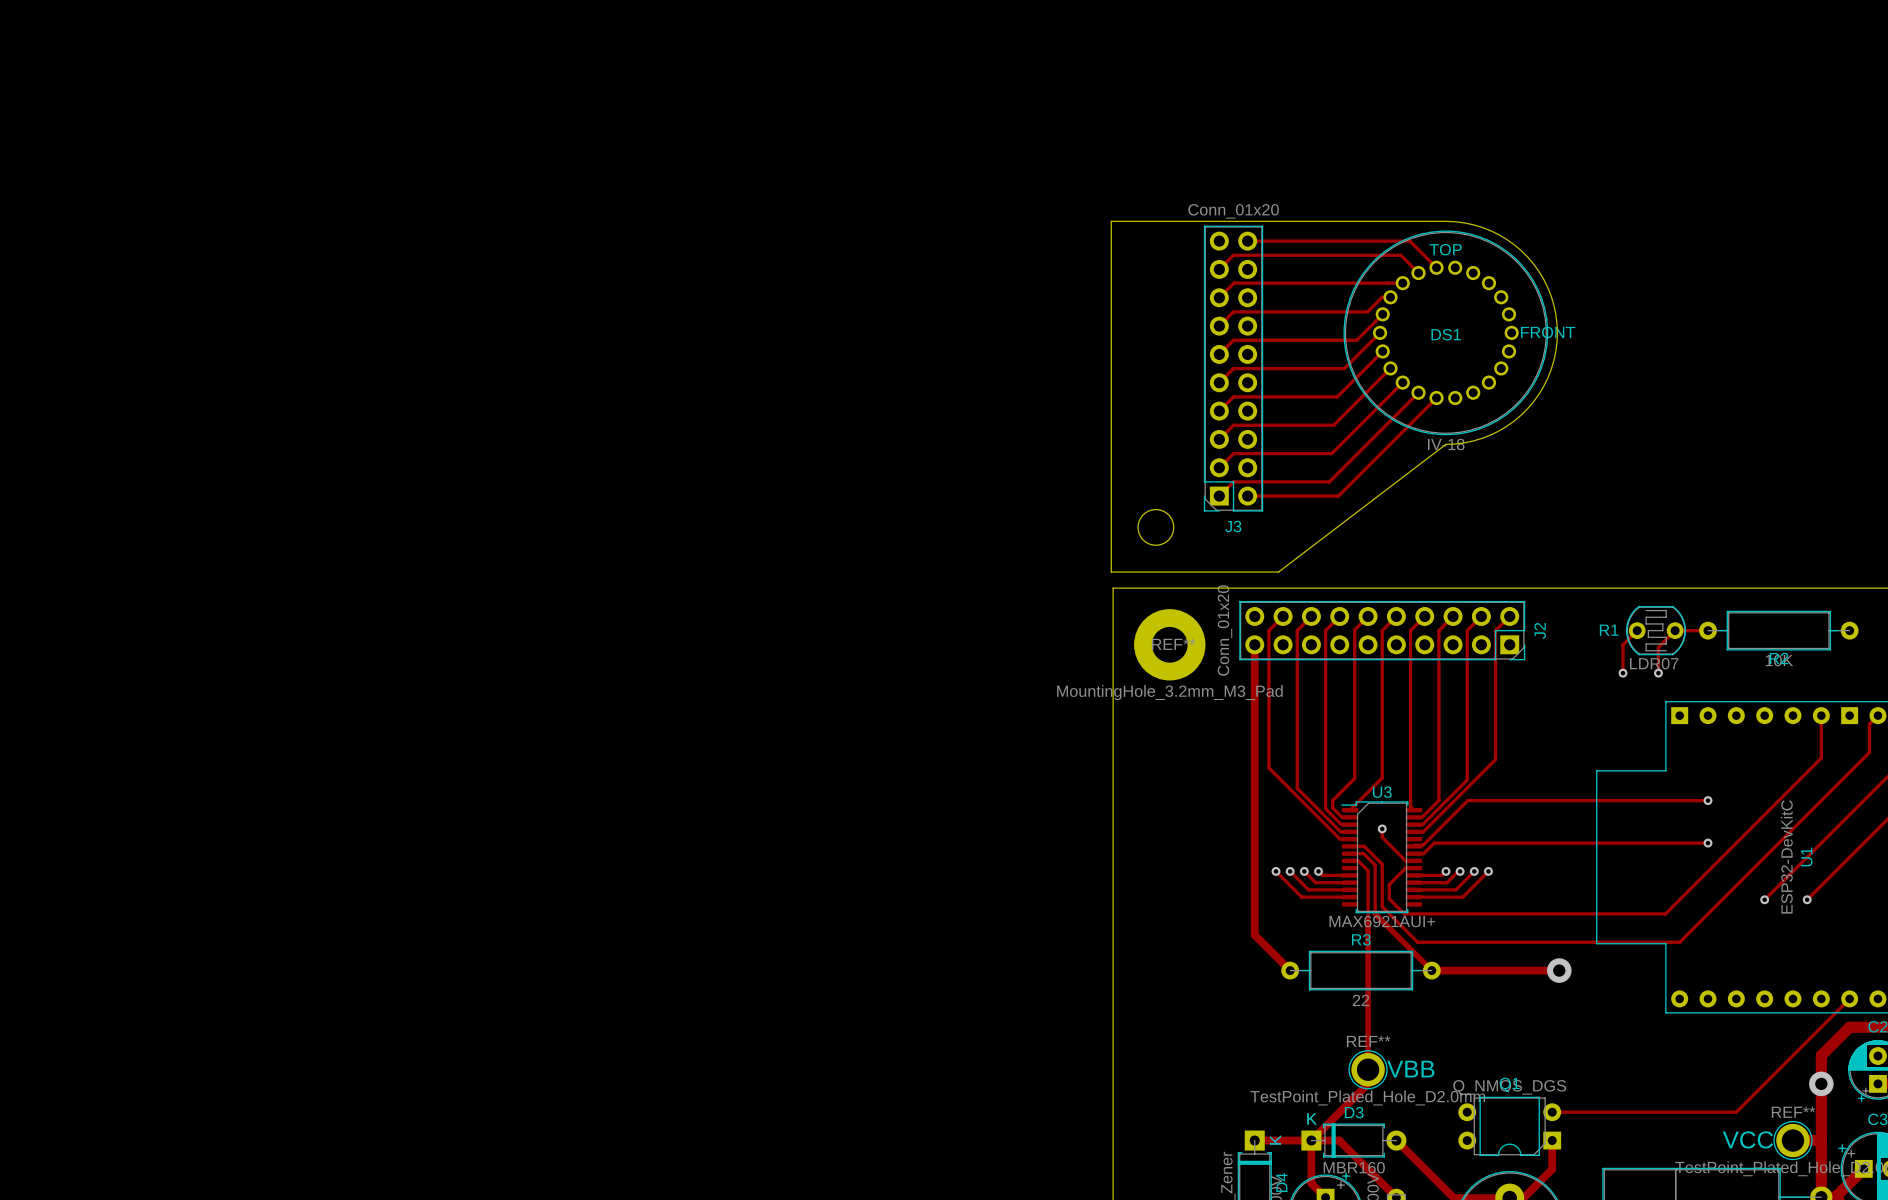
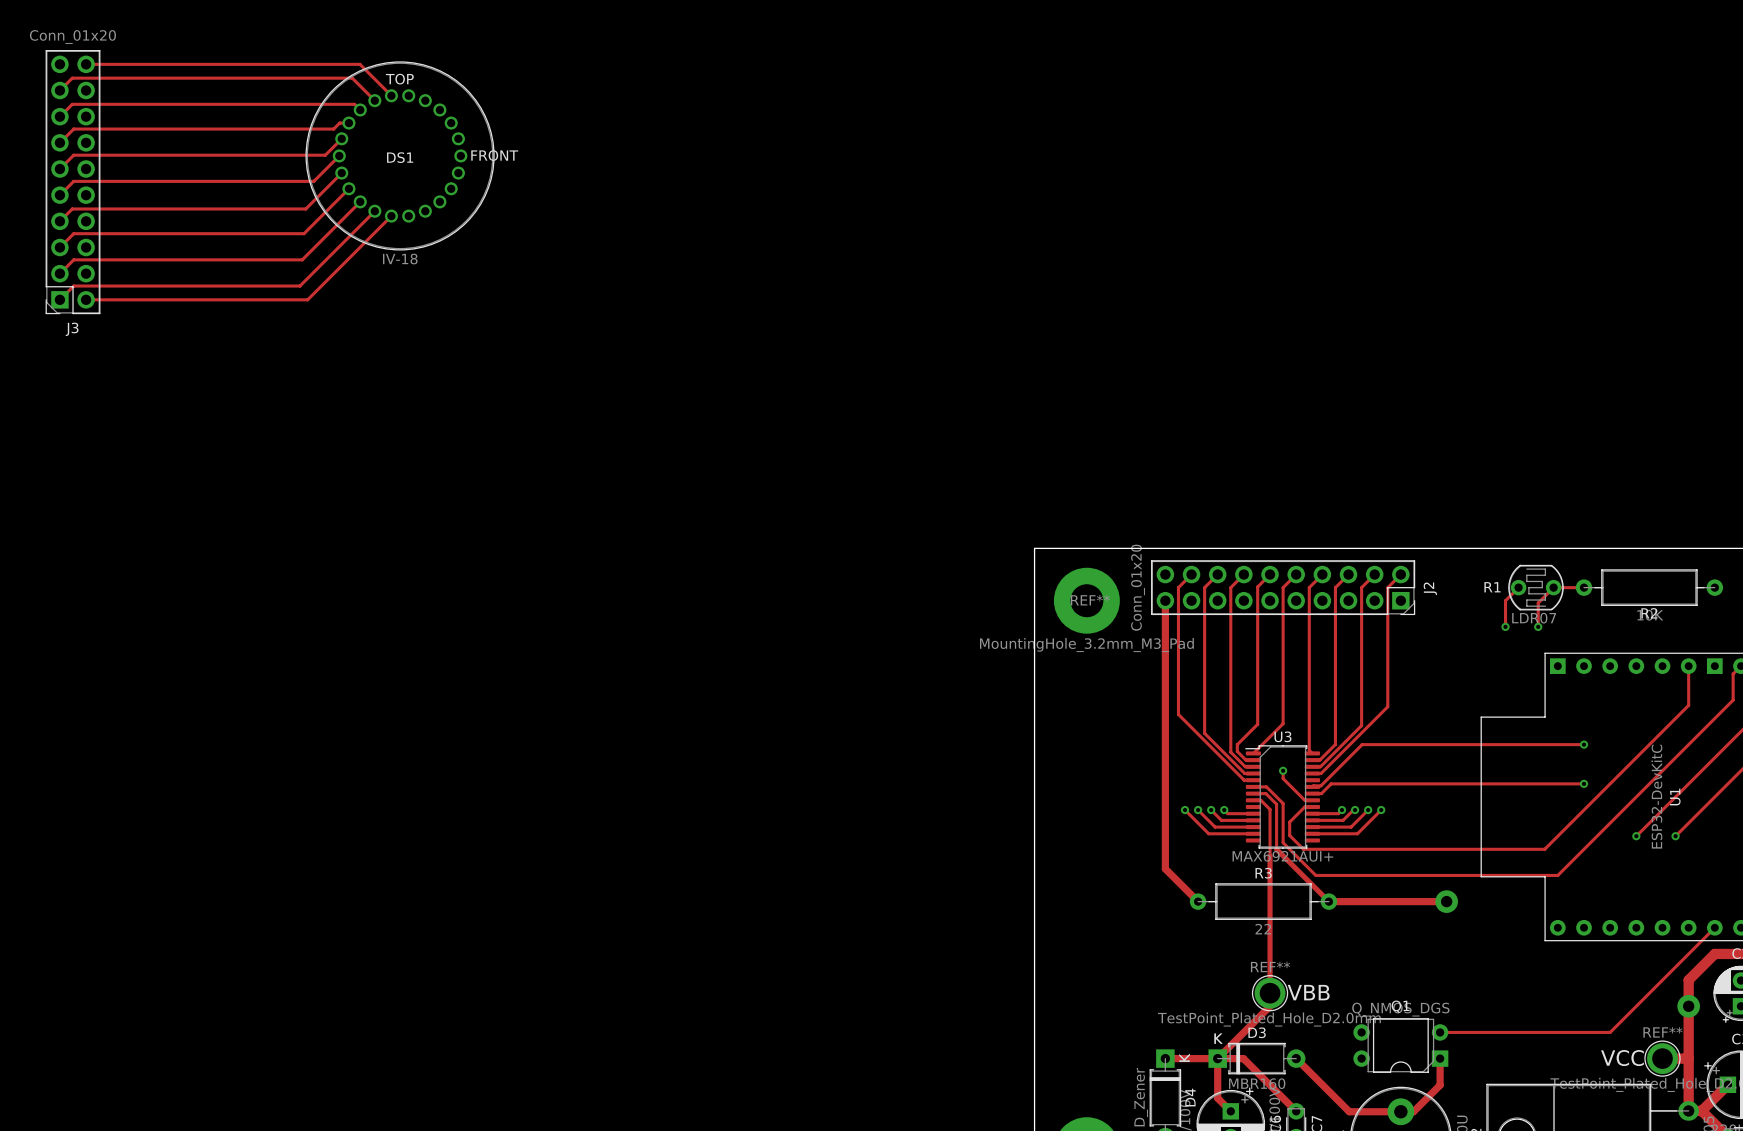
track: none -> (86, 64) (360, 64) (391, 95)
track: none -> (59, 90) (72, 78) (352, 78) (374, 100)
track: none -> (360, 110) (354, 104) (72, 104) (59, 116)
track: none -> (348, 123) (339, 123) (333, 129) (73, 129) (59, 142)
track: none -> (341, 138) (325, 155) (73, 155) (59, 169)
track: none -> (339, 155) (313, 181) (73, 181) (59, 195)
track: none -> (341, 173) (305, 208) (72, 208) (59, 221)
track: none -> (348, 188) (304, 233) (73, 233) (59, 247)
track: none -> (360, 201) (302, 259) (73, 259) (59, 273)
board edge: (1111, 221) (1111, 572) (1278, 572) (1445, 444) (1464, 442) (1482, 438) (1498, 430) (1514, 420) (1527, 408) (1539, 393) (1551, 369) (1555, 351) (1557, 332) (1553, 305) (1548, 288) (1539, 271) (1521, 250) (1506, 239) (1482, 227) (1464, 222) (1445, 221) (1111, 221) -> none
track: none -> (374, 211) (300, 286) (73, 286) (59, 299)
track: none -> (391, 216) (307, 299) (86, 299)
track: (1247, 241) (1409, 241) (1436, 267) -> none
track: (1219, 269) (1233, 255) (1400, 255) (1418, 273) -> none
track: (1402, 283) (1233, 283) (1219, 297) -> none
track: (1390, 297) (1382, 297) (1367, 311) (1233, 311) (1219, 326) -> none
track: (1382, 314) (1356, 340) (1233, 340) (1219, 354) -> none
track: (1380, 332) (1344, 368) (1233, 368) (1219, 382) -> none
DS1 position: (1445, 332) -> (400, 155)
track: (1382, 351) (1337, 396) (1233, 396) (1219, 411) -> none
J3 position: (1233, 368) -> (73, 182)
track: (1390, 368) (1333, 425) (1233, 425) (1219, 439) -> none
track: (1402, 382) (1331, 453) (1233, 453) (1219, 467) -> none
track: (1418, 392) (1329, 481) (1233, 481) (1219, 496) -> none
track: (1436, 398) (1338, 496) (1247, 496) -> none
round board edge: [1137, 509, 1175, 546] -> none

